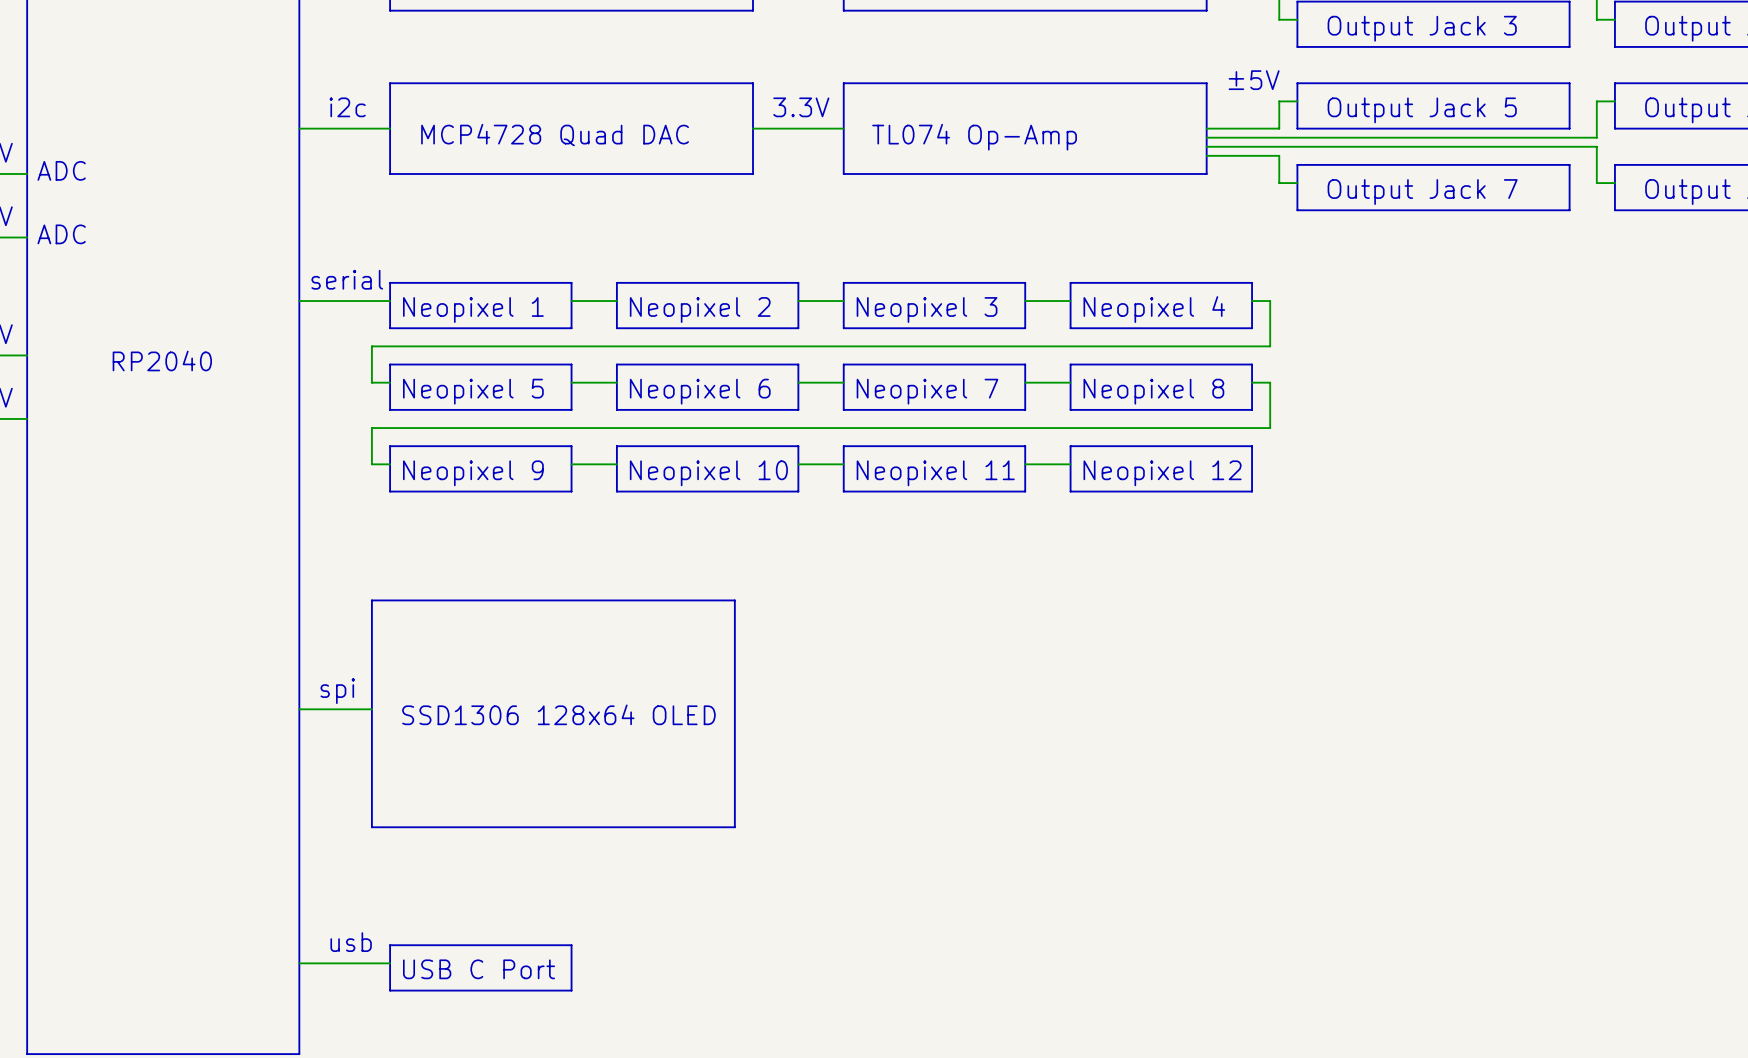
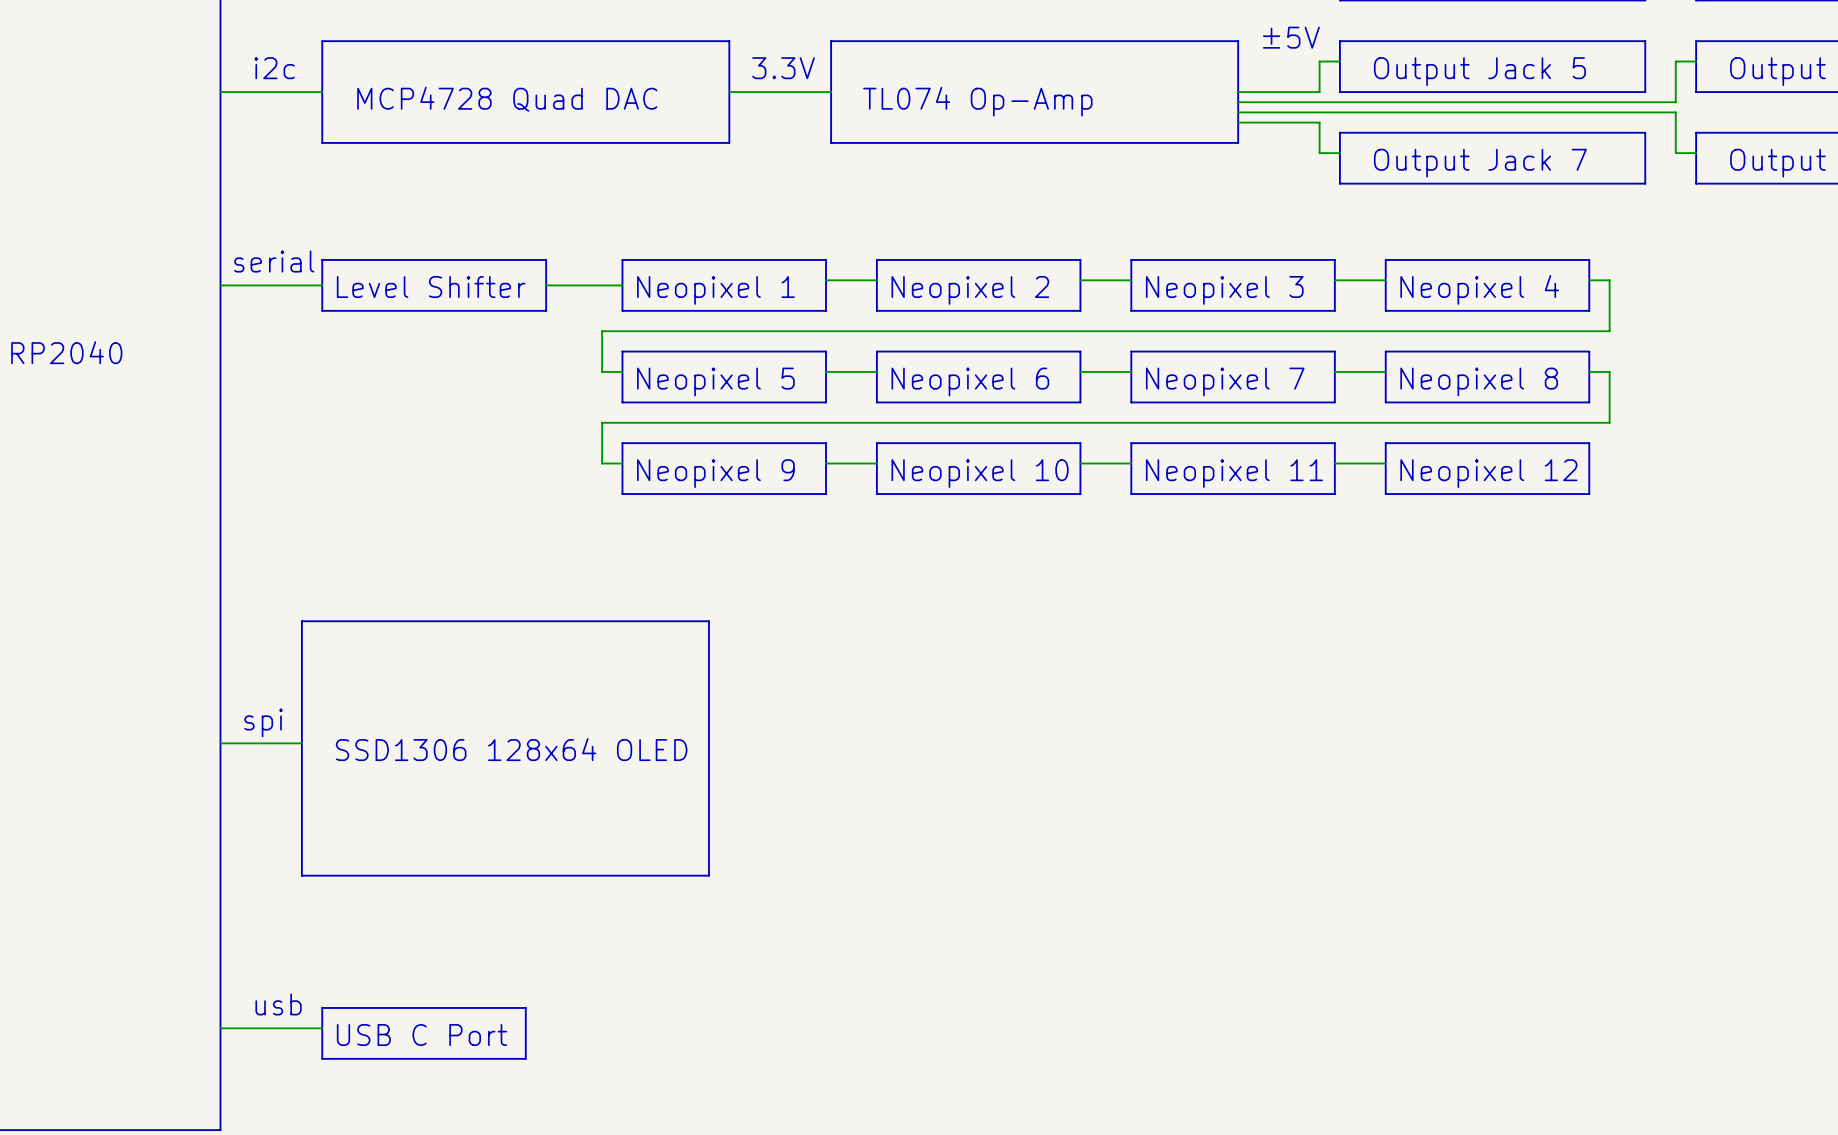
line: none -> (1385, 259) (1589, 259) (1589, 310) (1385, 310) (1385, 259)
line: (390, 282) (571, 282) (571, 328) (390, 328) (390, 323) -> (322, 265) (322, 259) (546, 259) (546, 310) (322, 310)
line: (616, 282) (798, 282) (798, 328) (616, 328) (616, 282) -> (622, 259) (826, 259) (826, 310) (622, 310) (622, 259)
line: (843, 282) (1025, 282) (1025, 328) (843, 328) (843, 282) -> (876, 259) (1080, 259) (1080, 310) (876, 310) (876, 259)
line: (1070, 282) (1252, 282) (1252, 328) (1070, 328) (1070, 282) -> (1131, 259) (1334, 259) (1334, 310) (1131, 310) (1131, 259)
wire: none -> (1334, 280) (1385, 280)
wire: none -> (1589, 280) (1609, 280) (1609, 331) (602, 331) (602, 371) (622, 371)
wire: (571, 301) (589, 301) -> none
wire: none -> (576, 285) (622, 285)
wire: (798, 301) (843, 301) -> (826, 280) (876, 280)
wire: (1025, 301) (1070, 301) -> (1080, 280) (1131, 280)
wire: (1252, 301) (1270, 301) (1270, 346) (371, 346) (371, 382) (390, 382) -> none
text: none -> Level Shifter (431, 287)
text: none -> Neopixel 4 (1479, 289)
text: Neopixel 4 (1154, 309) -> Neopixel 3 (1224, 290)
text: Neopixel 1 (473, 310) -> none
text: Neopixel 2 (700, 310) -> Neopixel 1 (715, 290)
text: Neopixel 3 (927, 310) -> Neopixel 2 (970, 290)
line: none -> (1385, 351) (1385, 402) (1589, 402) (1589, 351) (1385, 351)
line: (390, 364) (390, 409) (571, 409) (571, 364) (390, 364) -> none
line: (616, 364) (616, 409) (798, 409) (798, 364) (616, 364) -> (622, 351) (622, 402) (826, 402) (826, 351) (622, 351)
line: (843, 364) (843, 409) (1025, 409) (1025, 364) (843, 364) -> (876, 351) (876, 402) (1080, 402) (1080, 351) (876, 351)
line: (1070, 364) (1070, 409) (1252, 409) (1252, 364) (1070, 364) -> (1131, 351) (1131, 402) (1334, 402) (1334, 351) (1131, 351)
wire: none -> (1334, 371) (1385, 371)
wire: none -> (1589, 371) (1609, 371) (1609, 422) (602, 422) (602, 463) (622, 463)
wire: (571, 382) (616, 382) -> none
wire: (798, 382) (843, 382) -> (826, 371) (876, 371)
wire: (1025, 382) (1070, 382) -> (1080, 371) (1131, 371)
wire: (1252, 382) (1270, 382) (1270, 428) (371, 428) (371, 464) (390, 464) -> none
text: none -> Neopixel 8 (1479, 381)
text: Neopixel 5 (473, 391) -> none
text: Neopixel 6 (700, 391) -> Neopixel 5 (715, 381)
text: Neopixel 7 (927, 391) -> Neopixel 6 (970, 381)
text: Neopixel 8 (1153, 391) -> Neopixel 7 (1225, 381)
line: none -> (1385, 443) (1589, 443) (1589, 494) (1385, 494) (1385, 443)
line: (390, 446) (390, 491) (571, 491) (571, 446) (390, 446) -> none
line: (616, 446) (616, 491) (798, 491) (798, 446) (616, 446) -> (622, 443) (622, 494) (826, 494) (826, 443) (622, 443)
line: (843, 446) (843, 491) (1025, 491) (1025, 446) (843, 446) -> (876, 443) (876, 494) (1080, 494) (1080, 443) (876, 443)
line: (1070, 446) (1252, 446) (1252, 491) (1070, 491) (1070, 446) -> (1131, 443) (1334, 443) (1334, 494) (1131, 494) (1131, 443)
wire: none -> (1334, 463) (1385, 463)
wire: (571, 464) (616, 464) -> none
wire: (798, 464) (843, 464) -> (826, 463) (876, 463)
wire: (1025, 464) (1070, 464) -> (1080, 463) (1131, 463)
text: none -> Neopixel 12 (1488, 473)
text: Neopixel 9 (473, 473) -> none
text: Neopixel 10 (708, 473) -> Neopixel 9 (715, 473)
text: Neopixel 11 (935, 473) -> Neopixel 10 (980, 473)
text: Neopixel 12 (1162, 473) -> Neopixel 11 (1234, 473)

